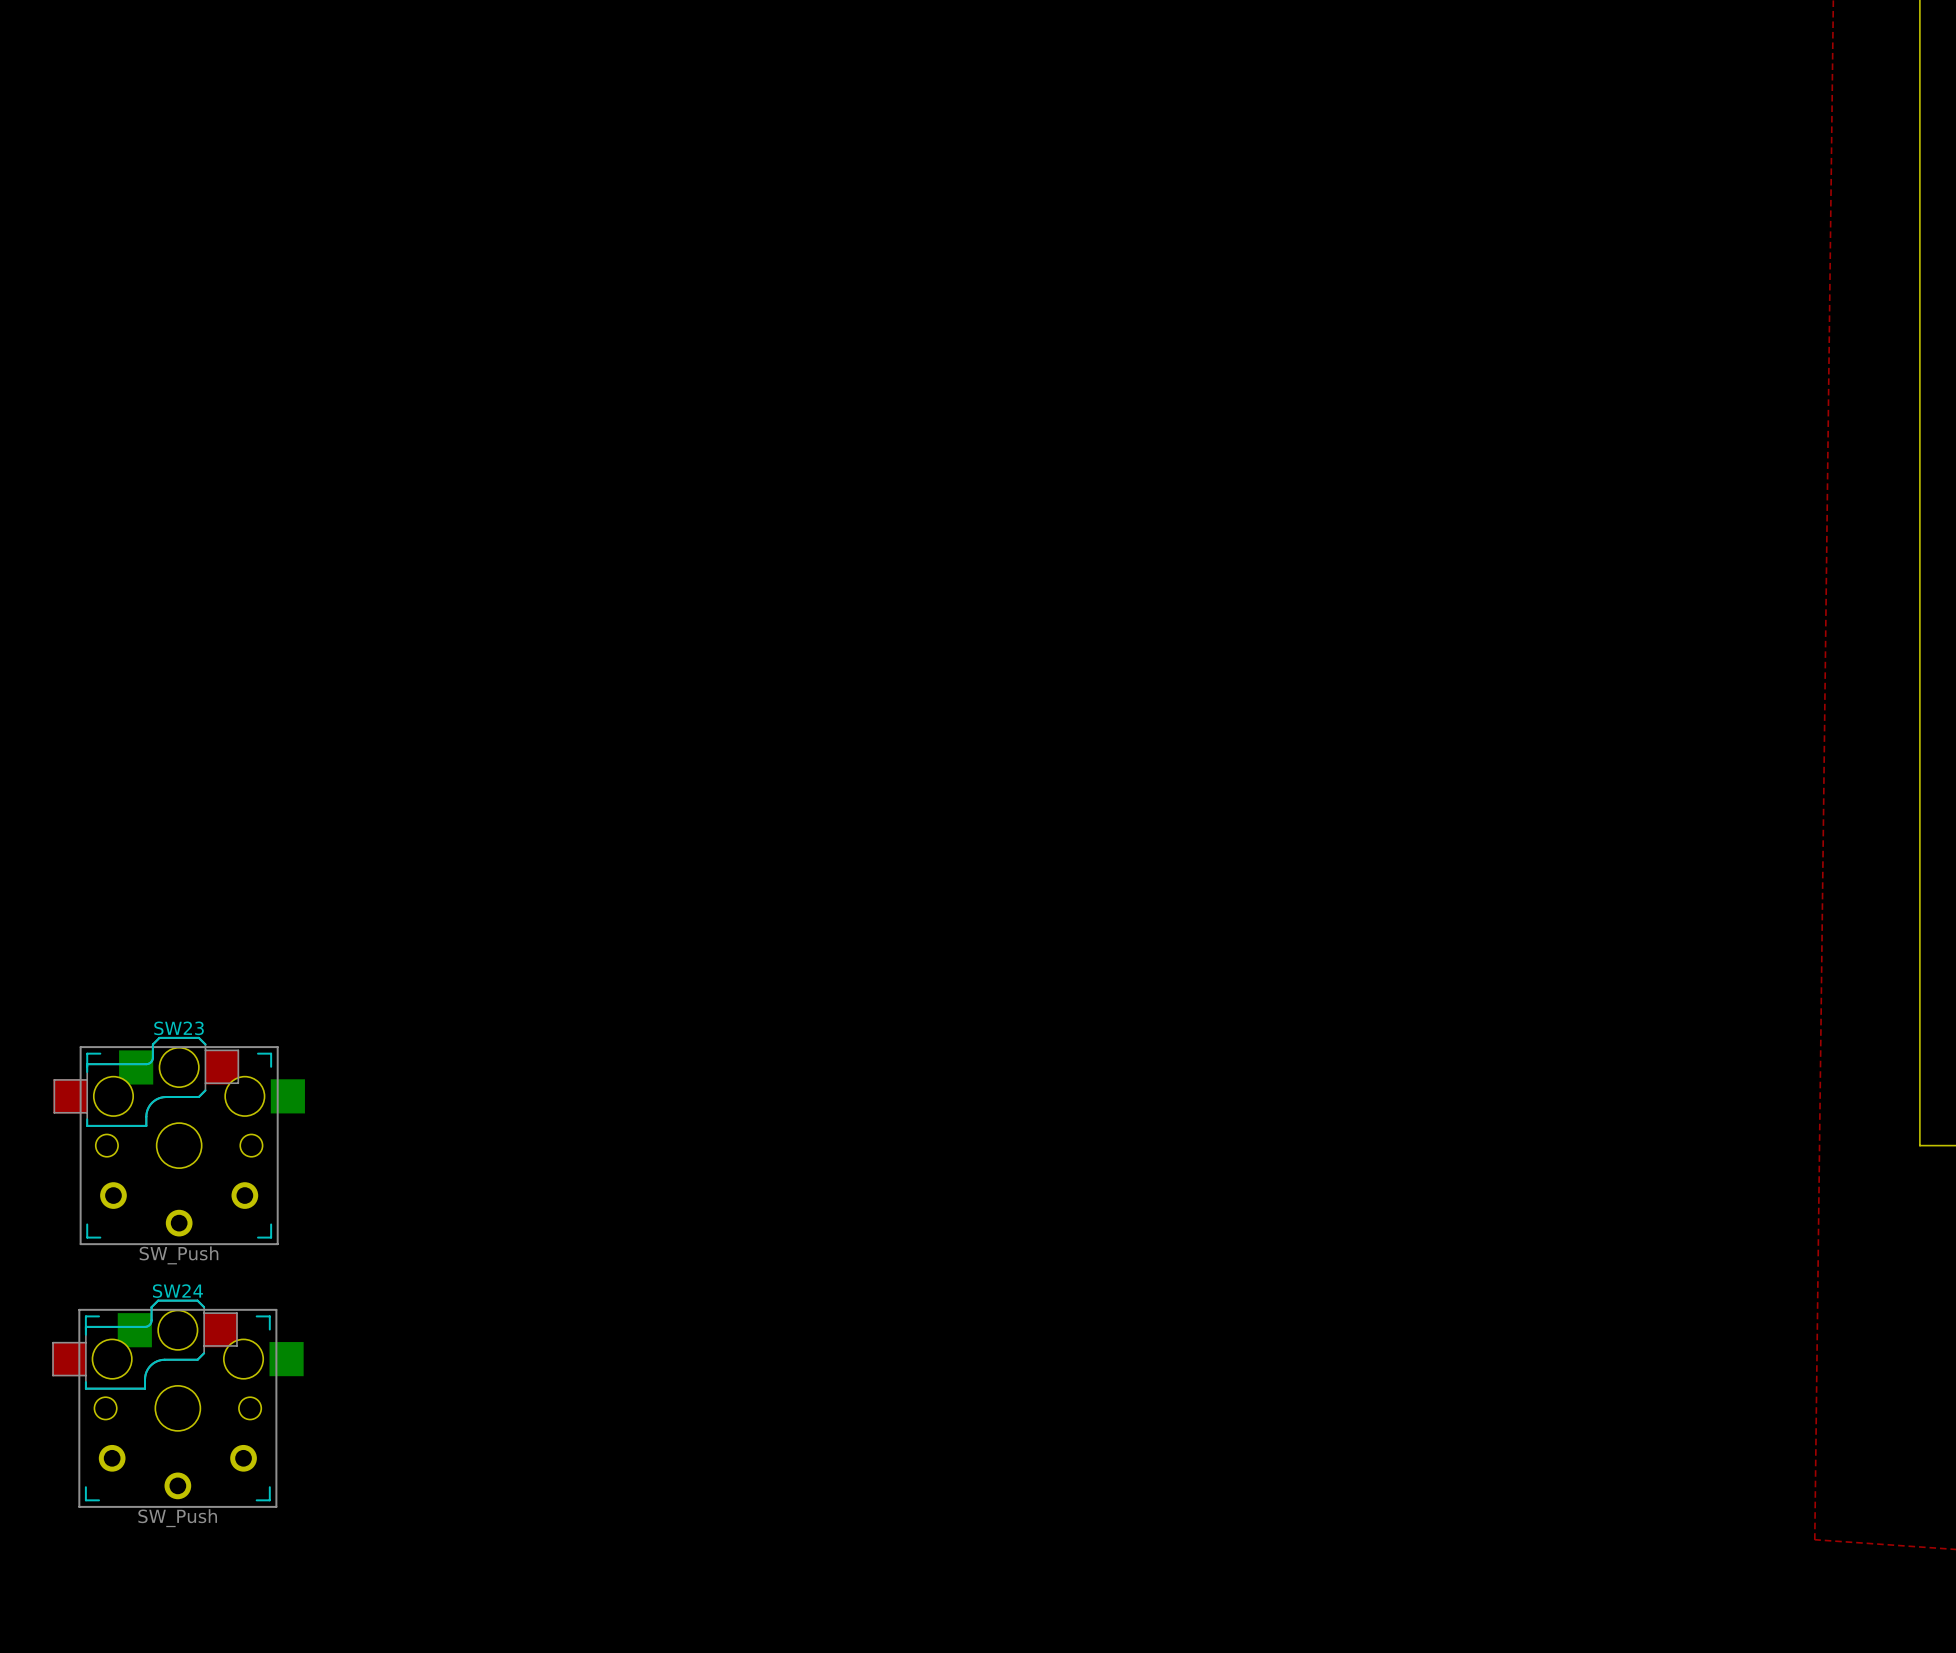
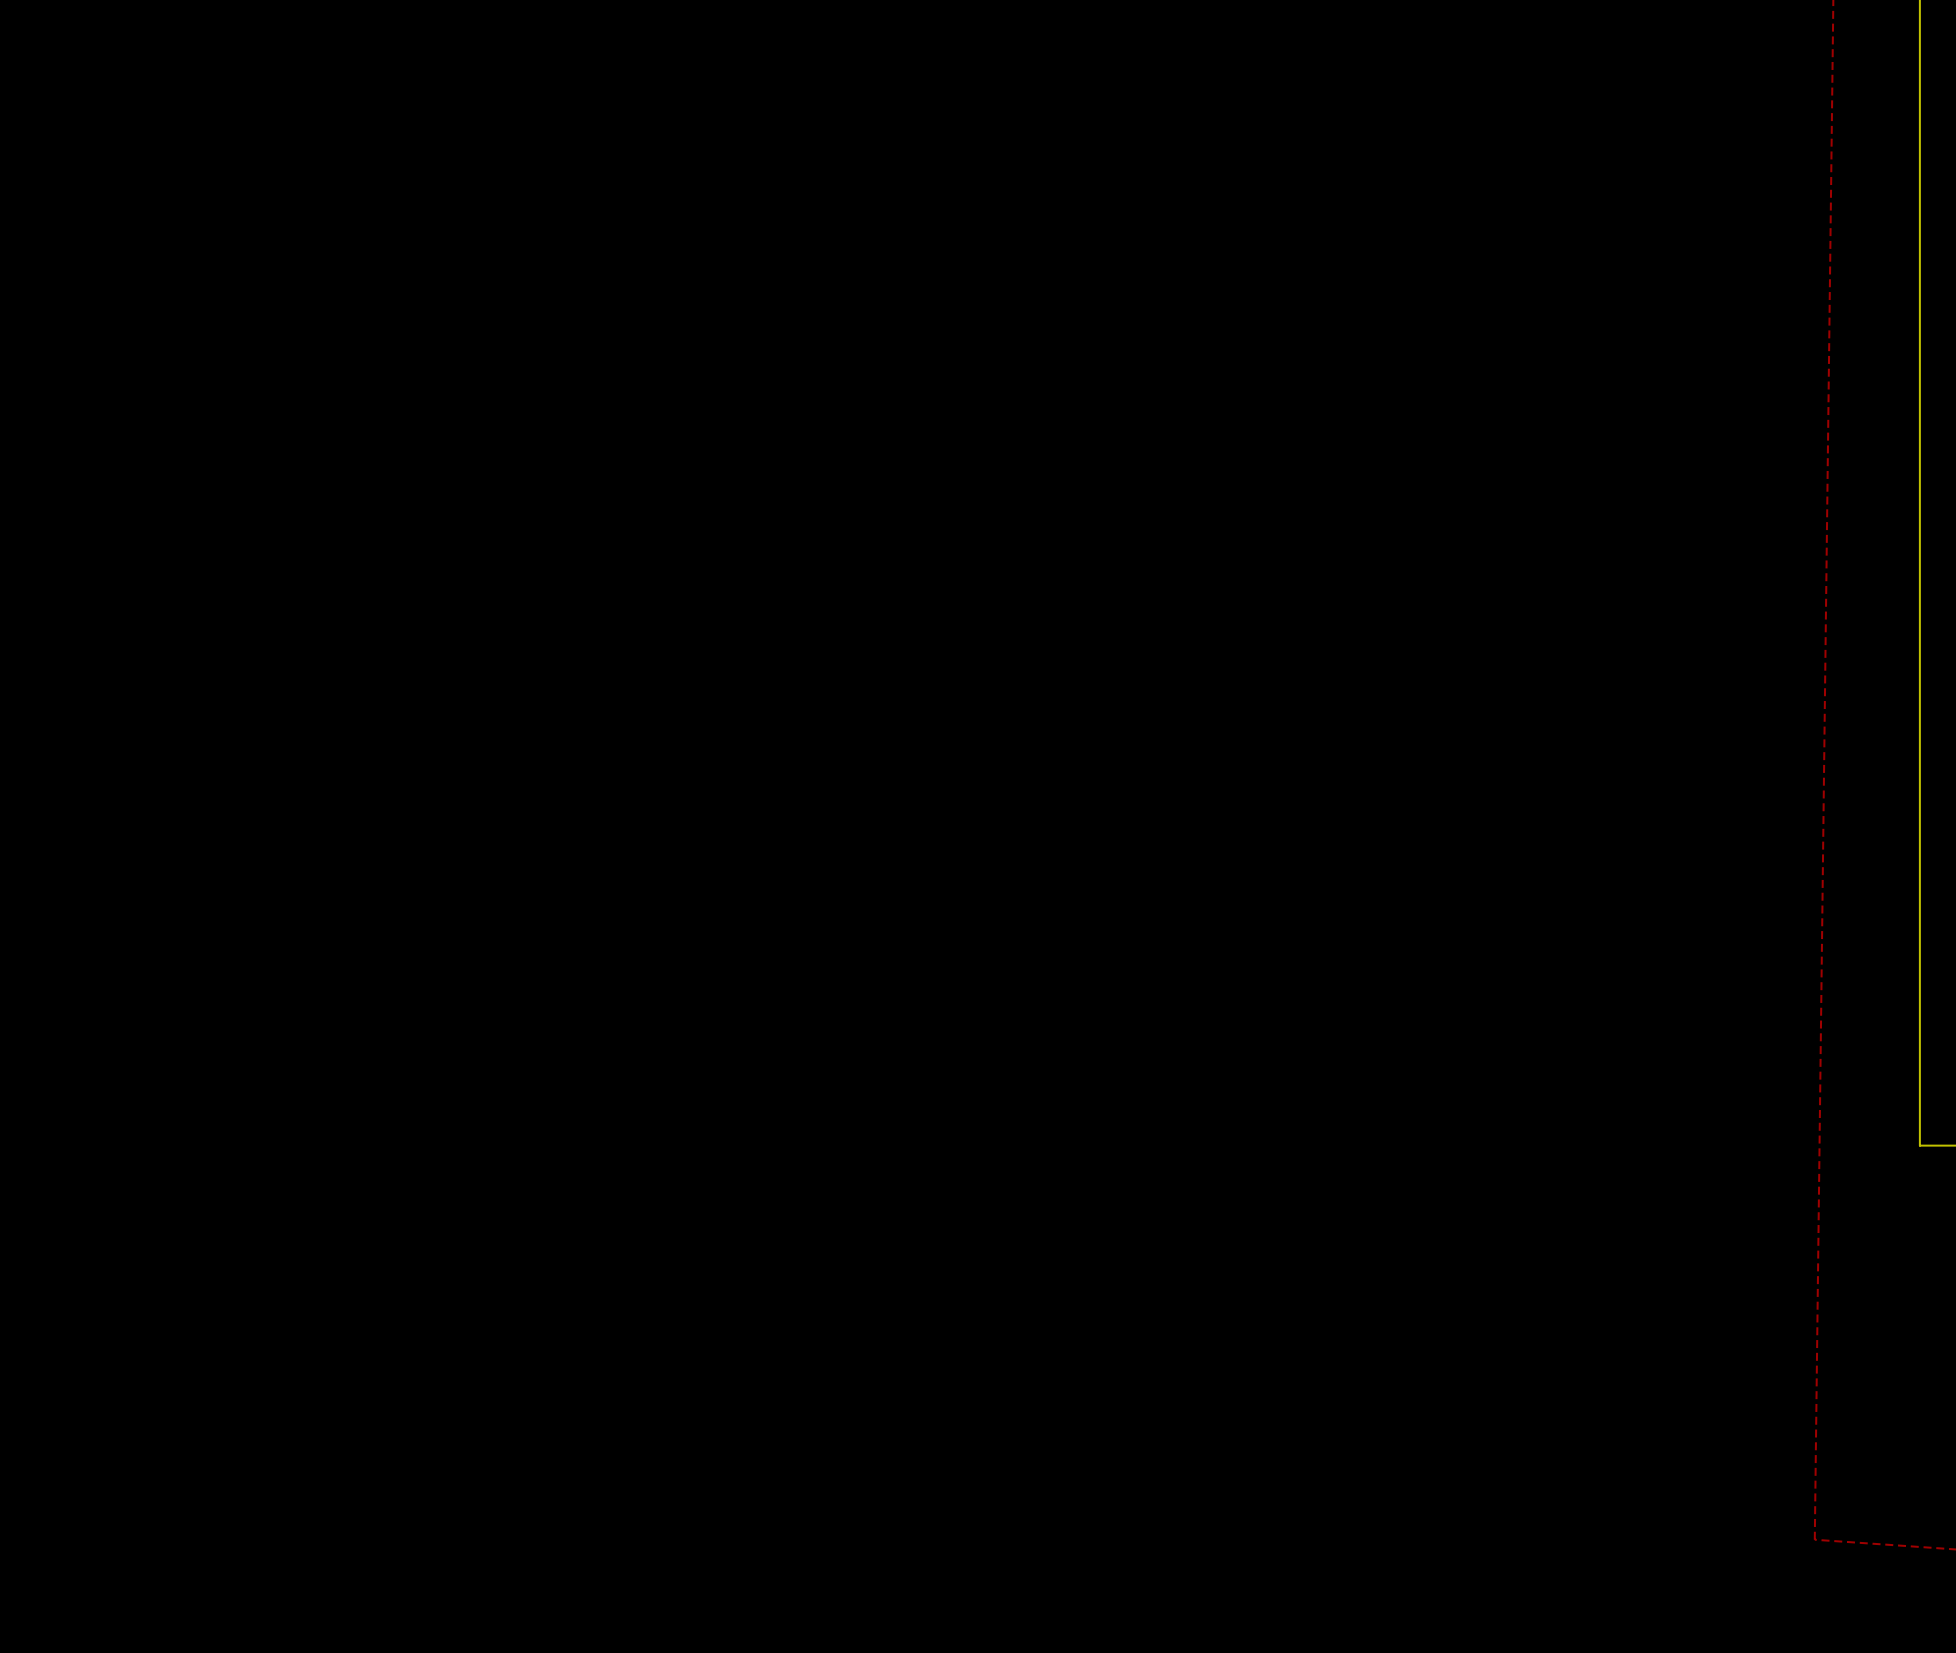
SW23: SW_Push (179, 1141) -> none
SW24: SW_Push (177, 1403) -> none

